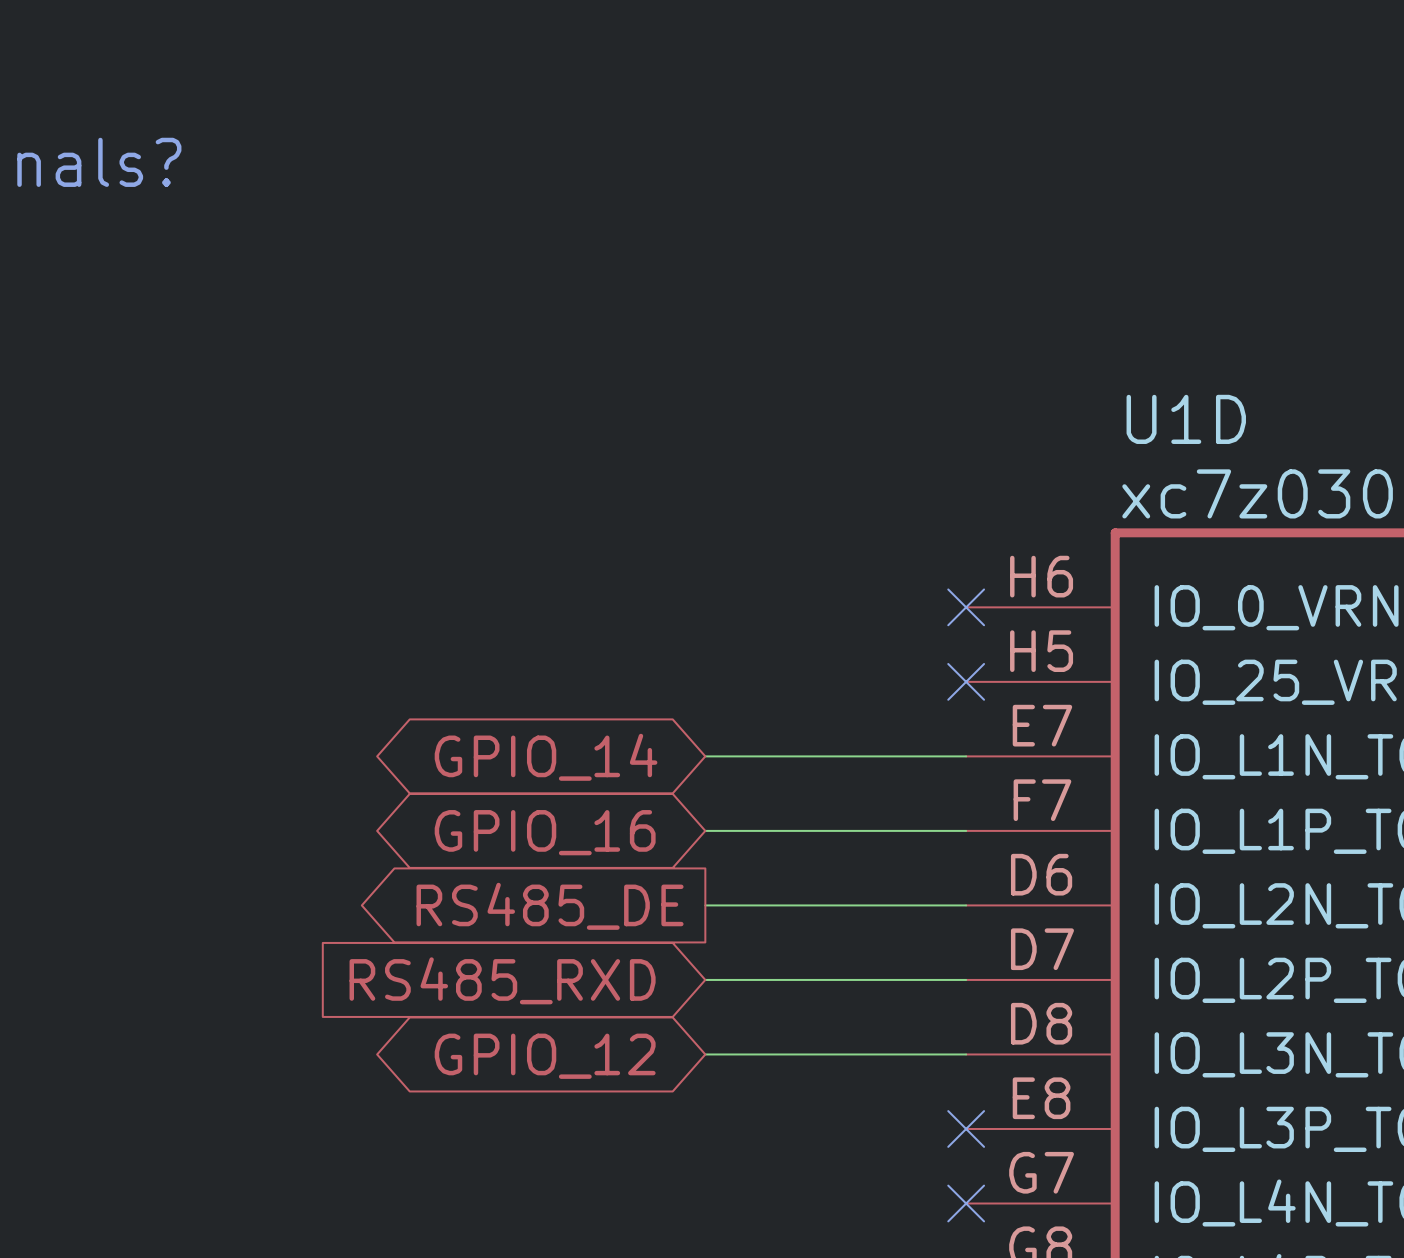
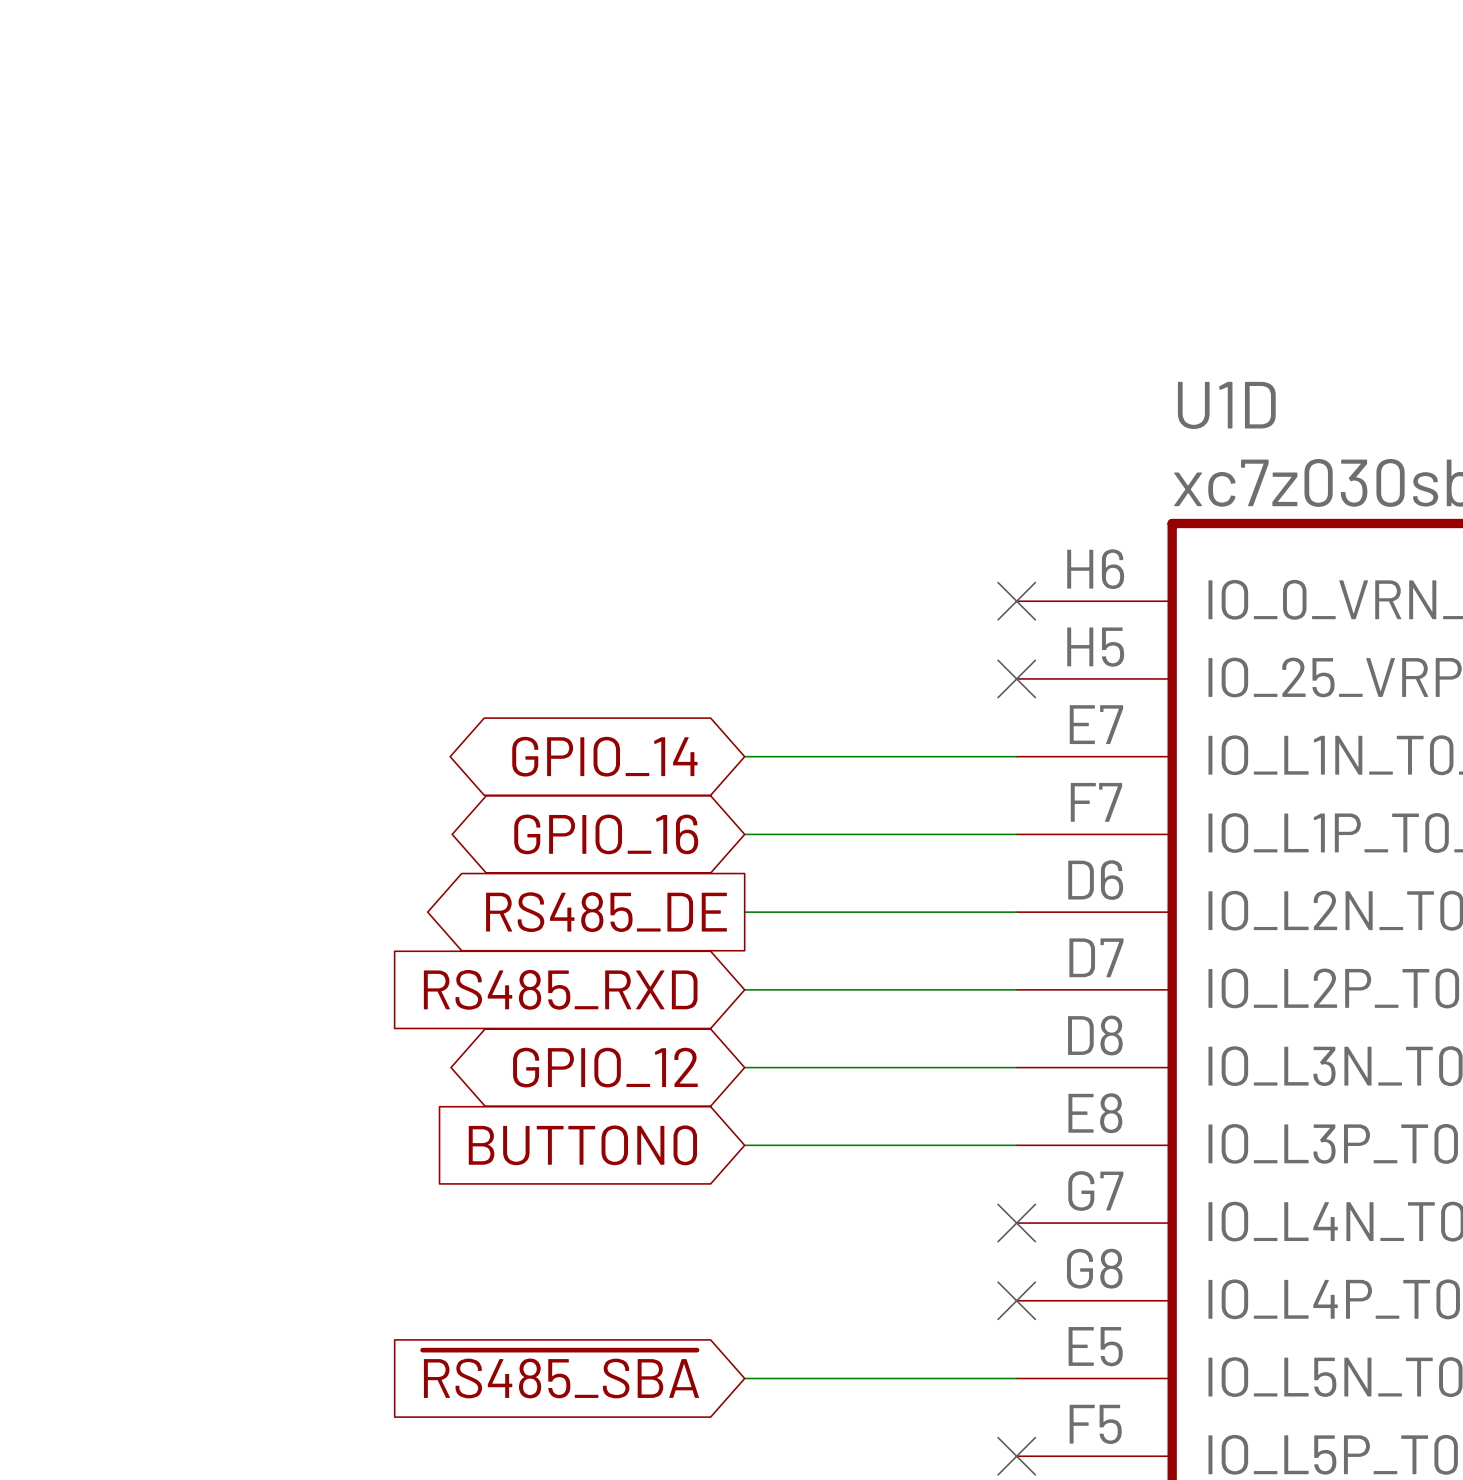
global label: none -> BUTTON0 (582, 1145)
wire: none -> (744, 1145) (1016, 1145)
no-connect mark: (966, 1128) -> none

